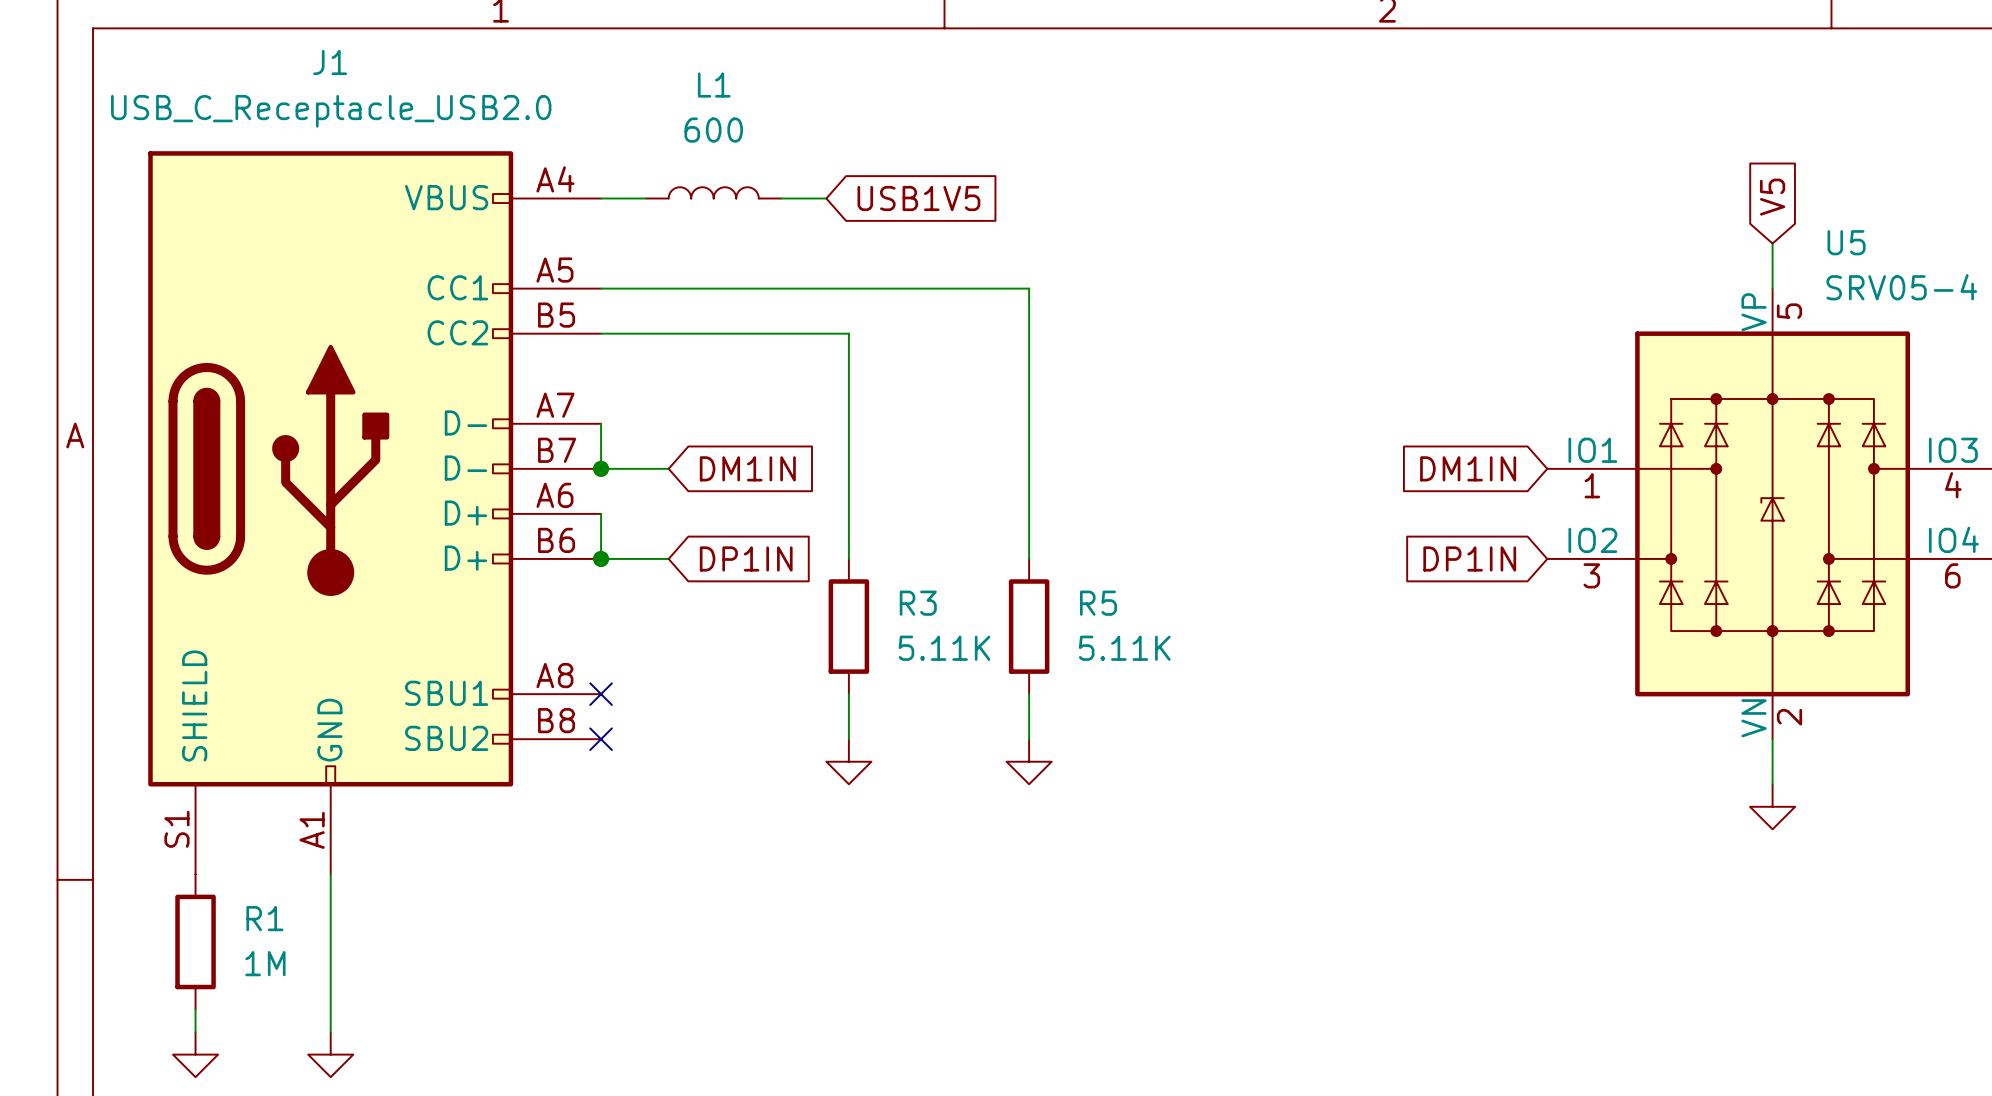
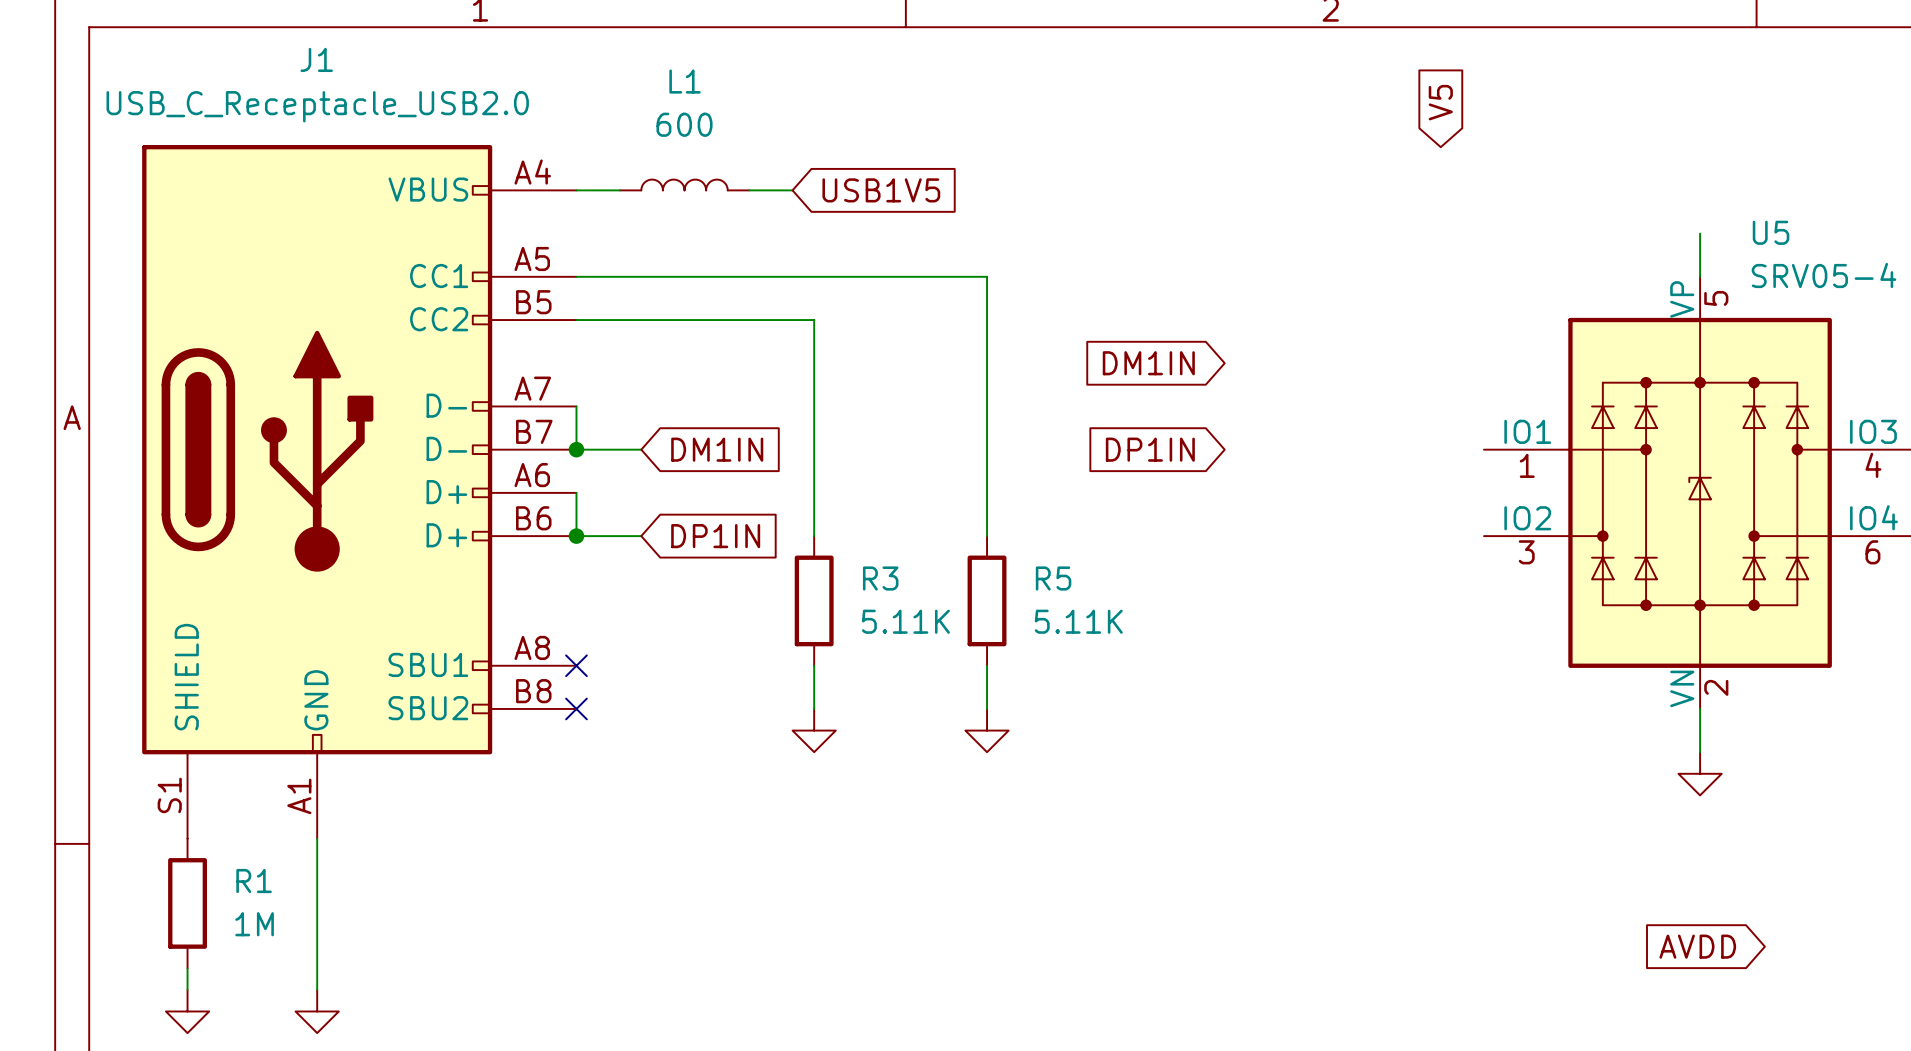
global label position: V5 (1772, 197) -> V5 (1440, 102)
global label position: DM1IN (1468, 468) -> DM1IN (1148, 363)
global label position: DP1IN (1469, 558) -> DP1IN (1150, 449)
global label: none -> AVDD (1697, 946)

